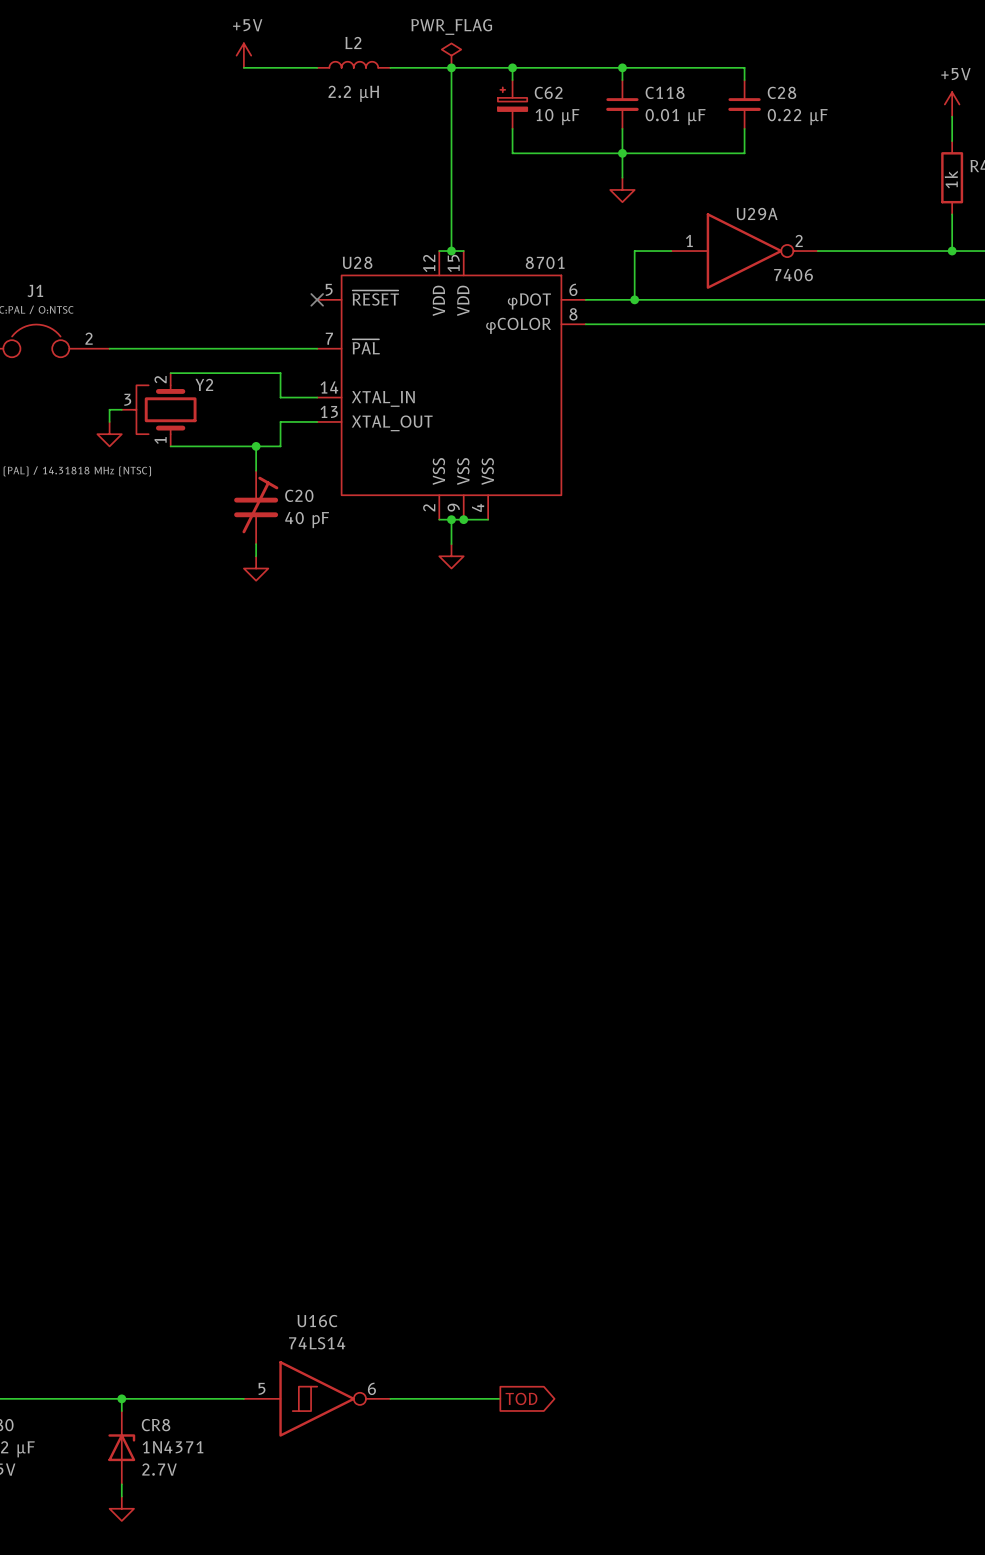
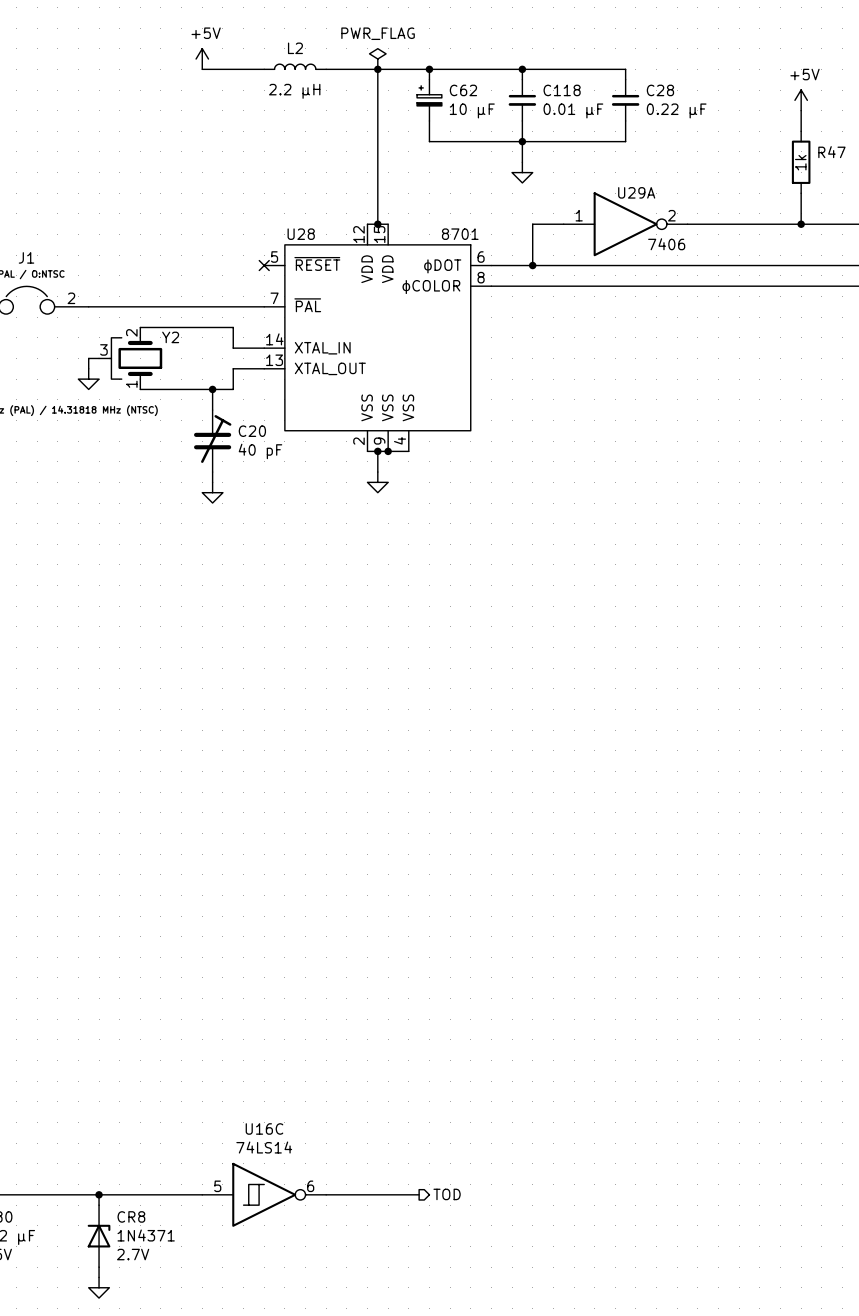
global label: TOD (521, 1398) -> none
hierarchical label: none -> TOD (447, 1194)

